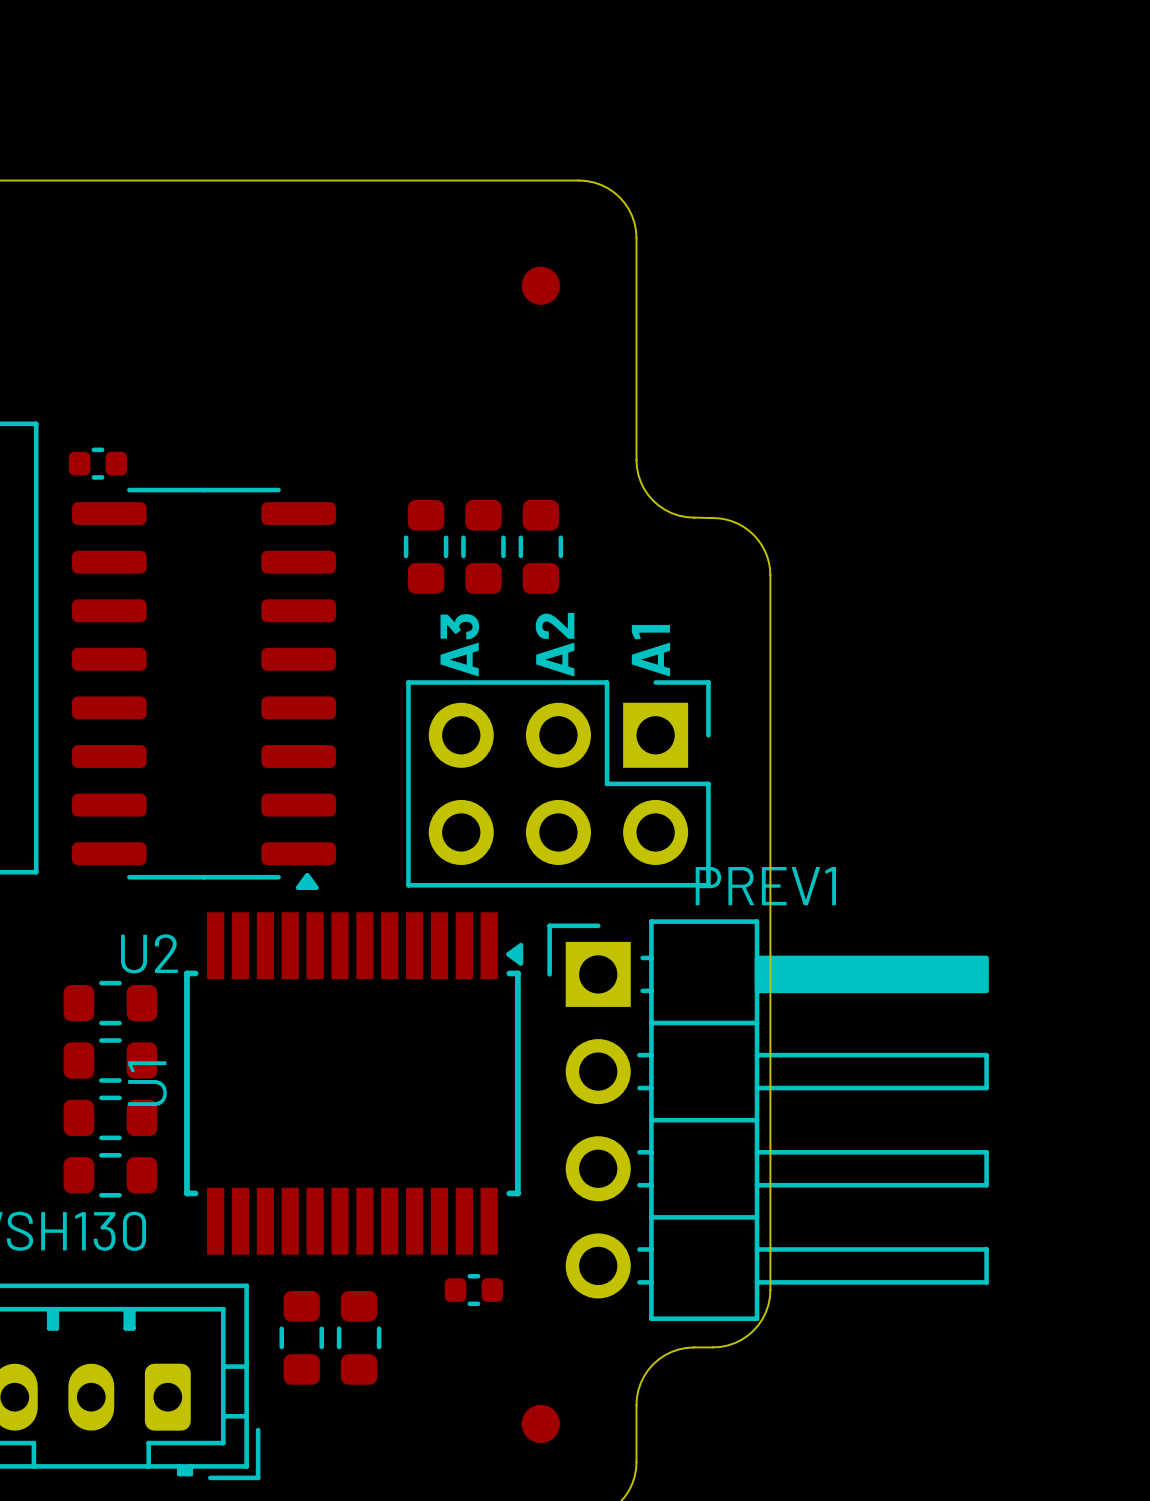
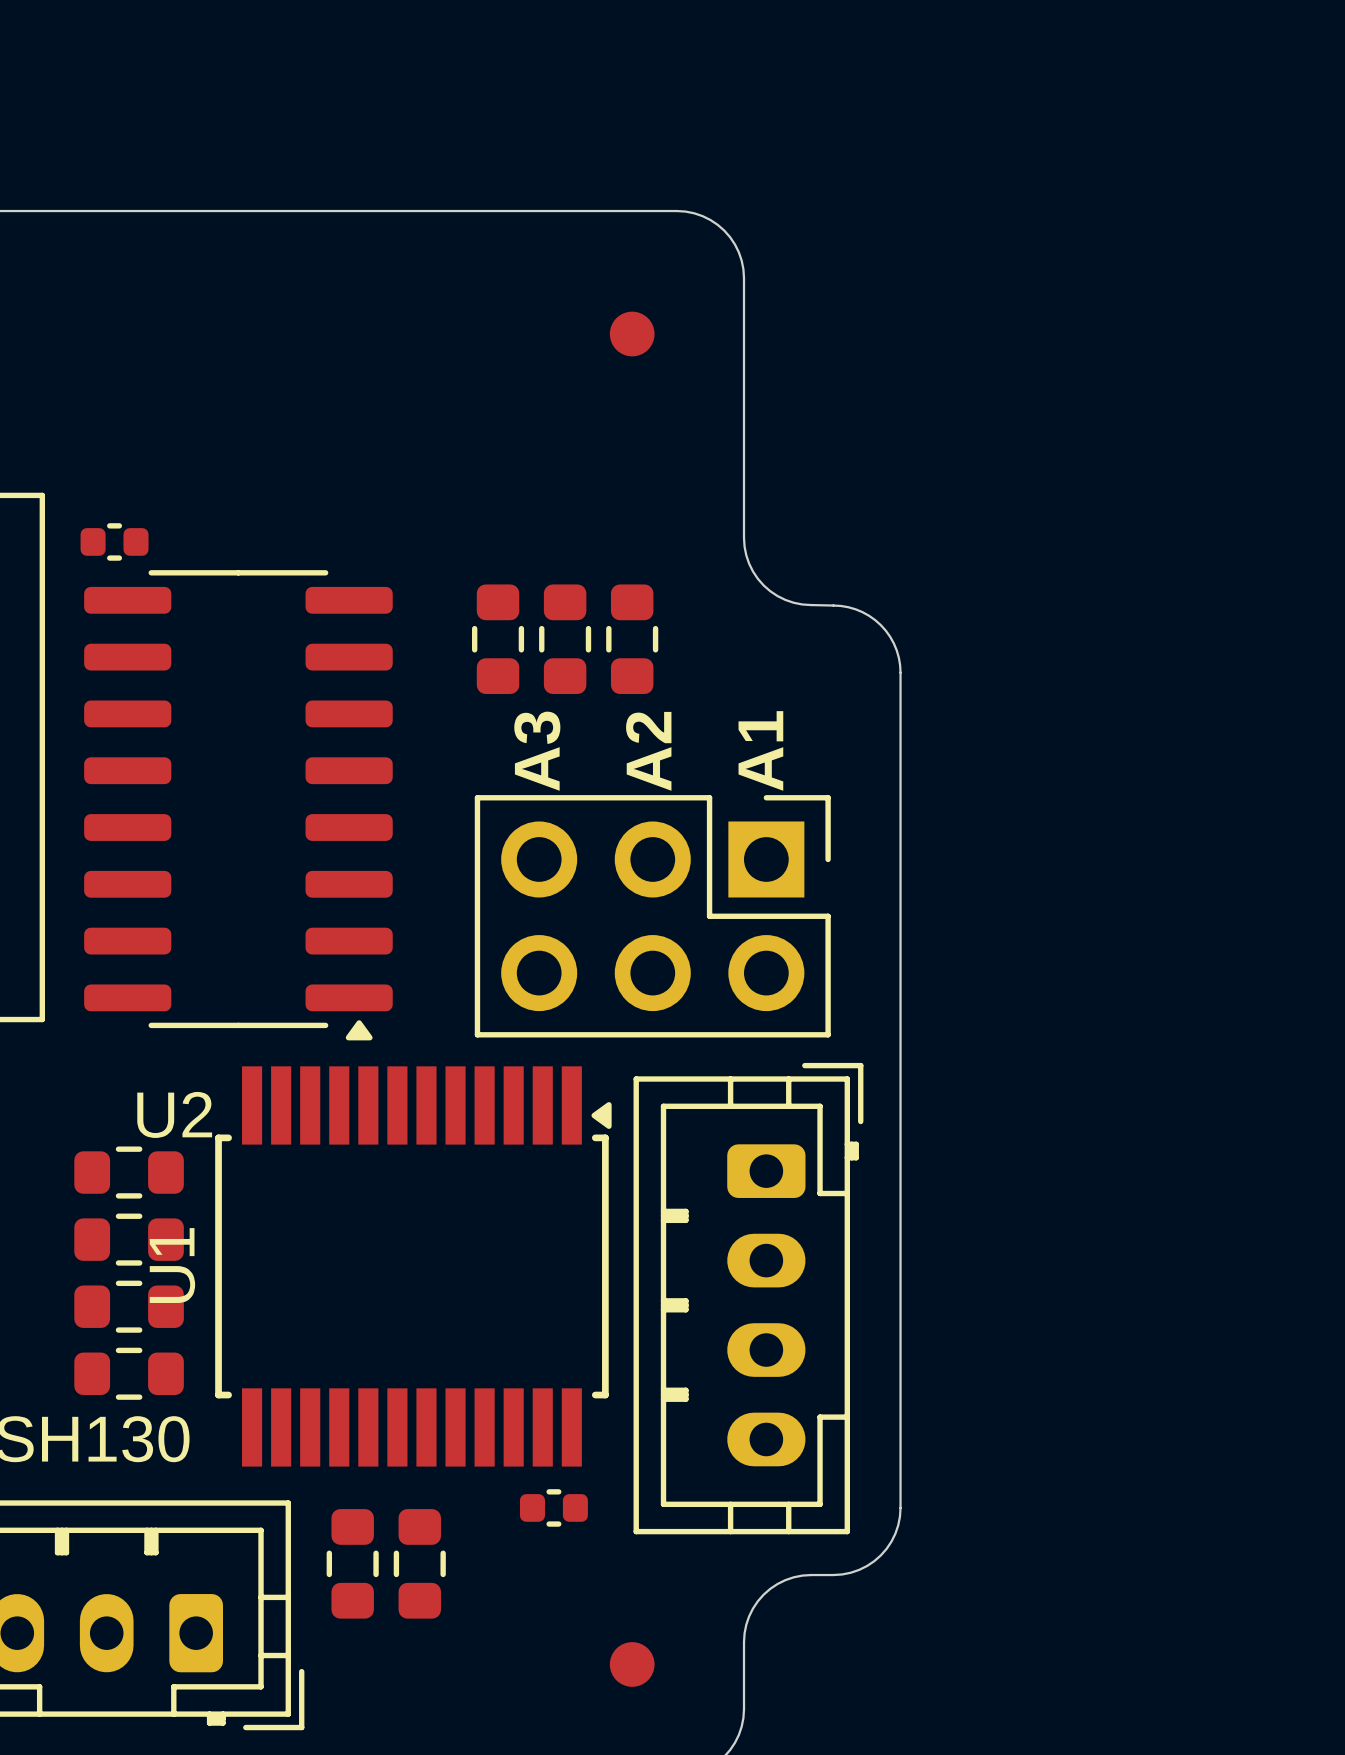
part: none -> (748, 1298)
PREV1: (768, 1120) -> none

